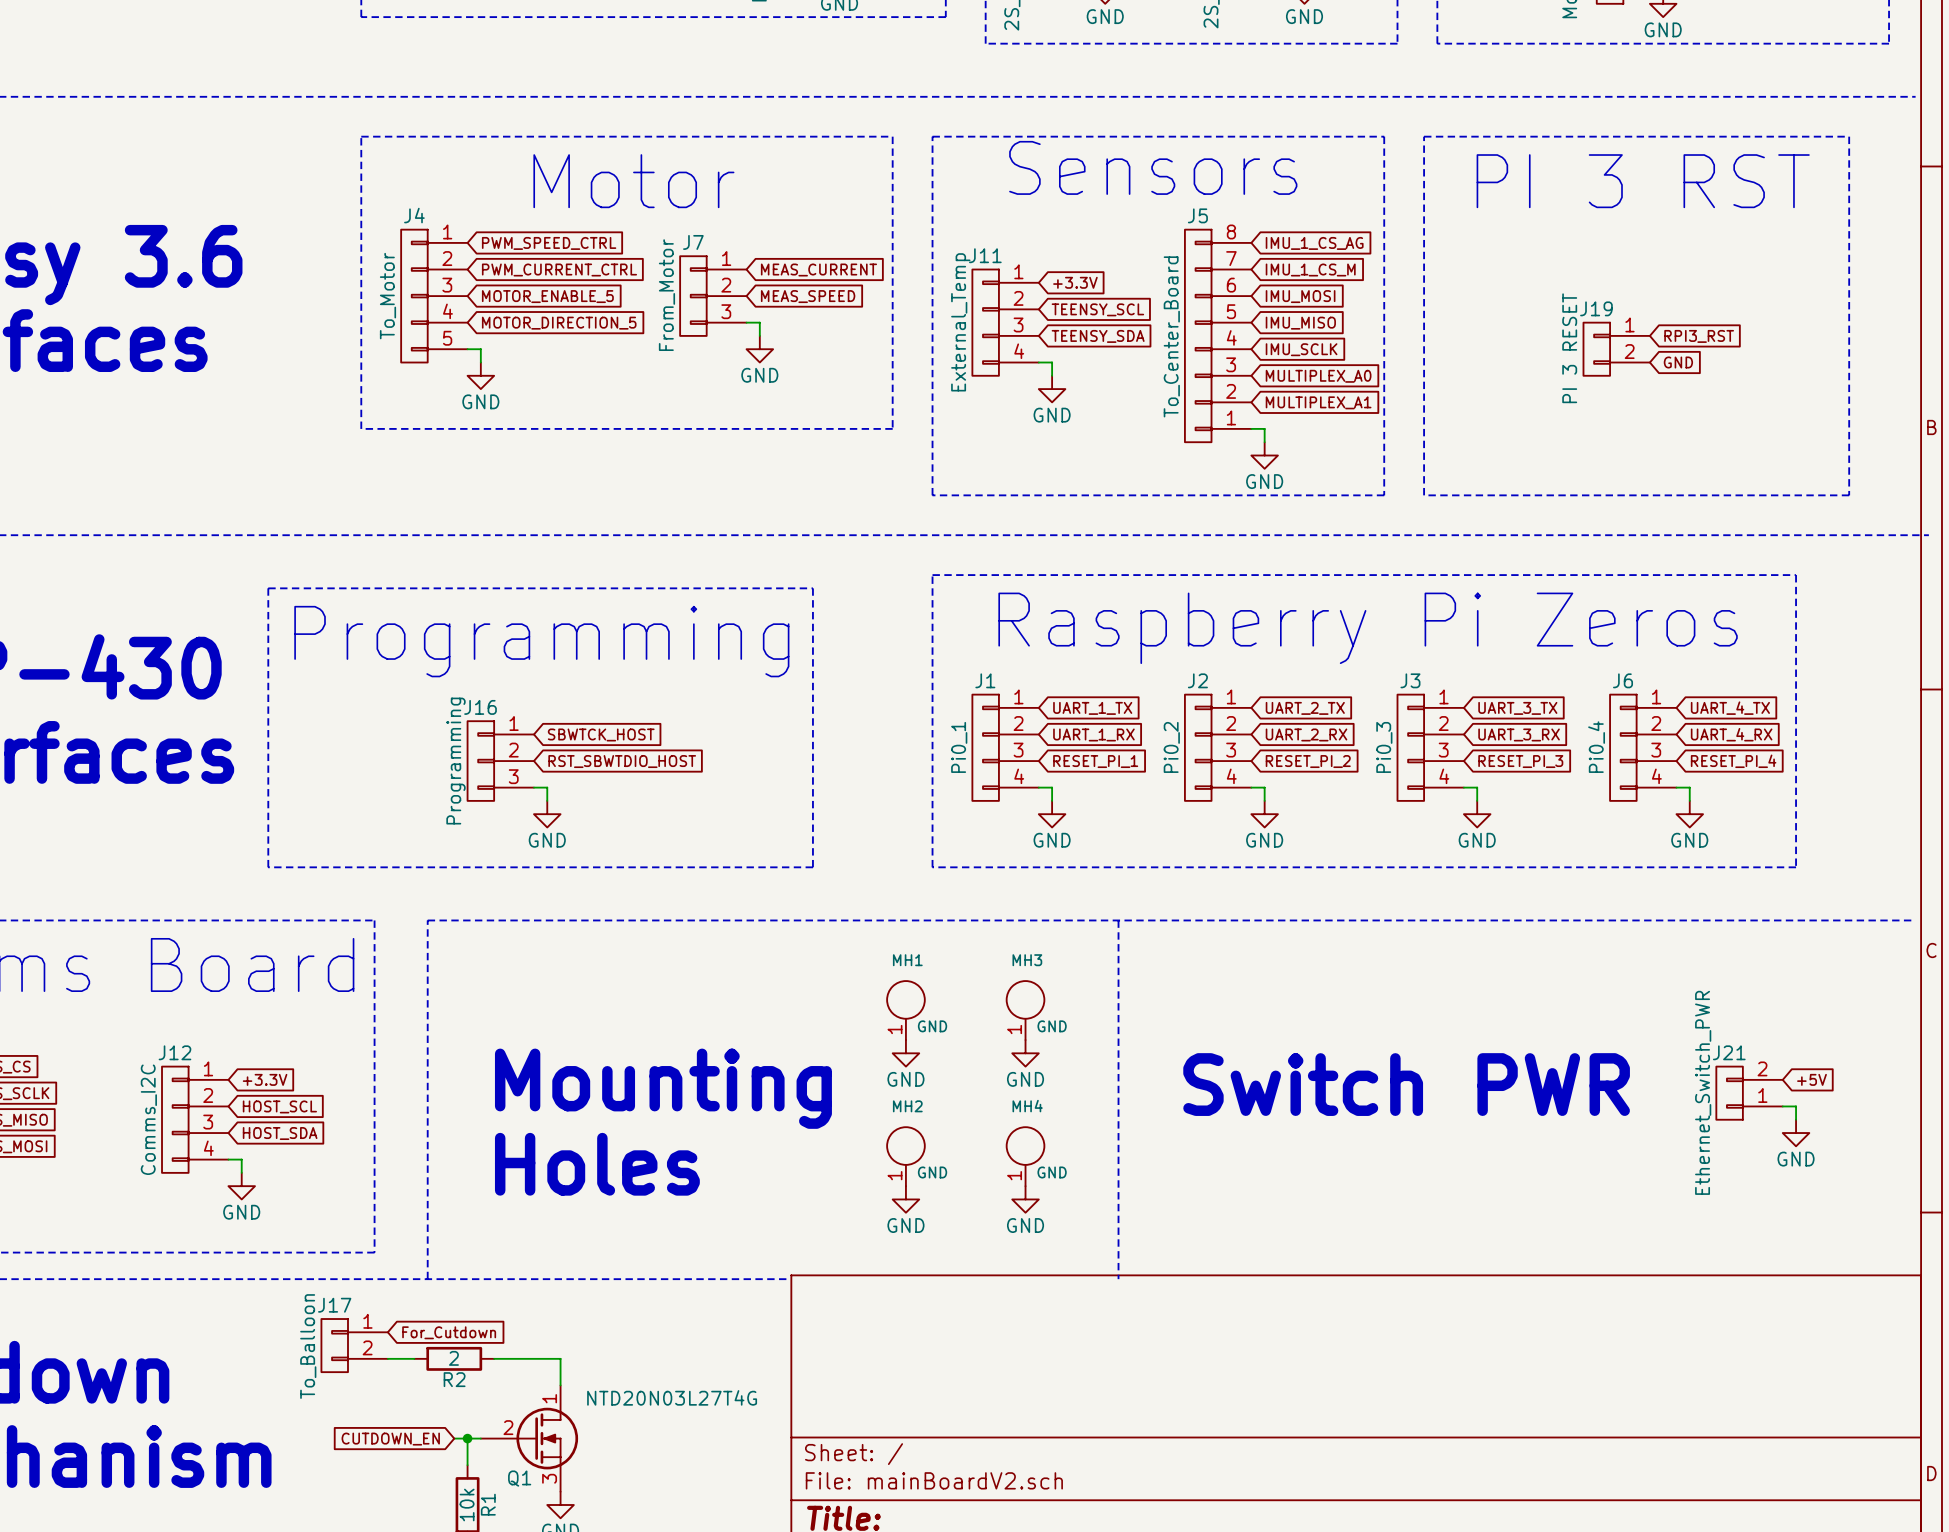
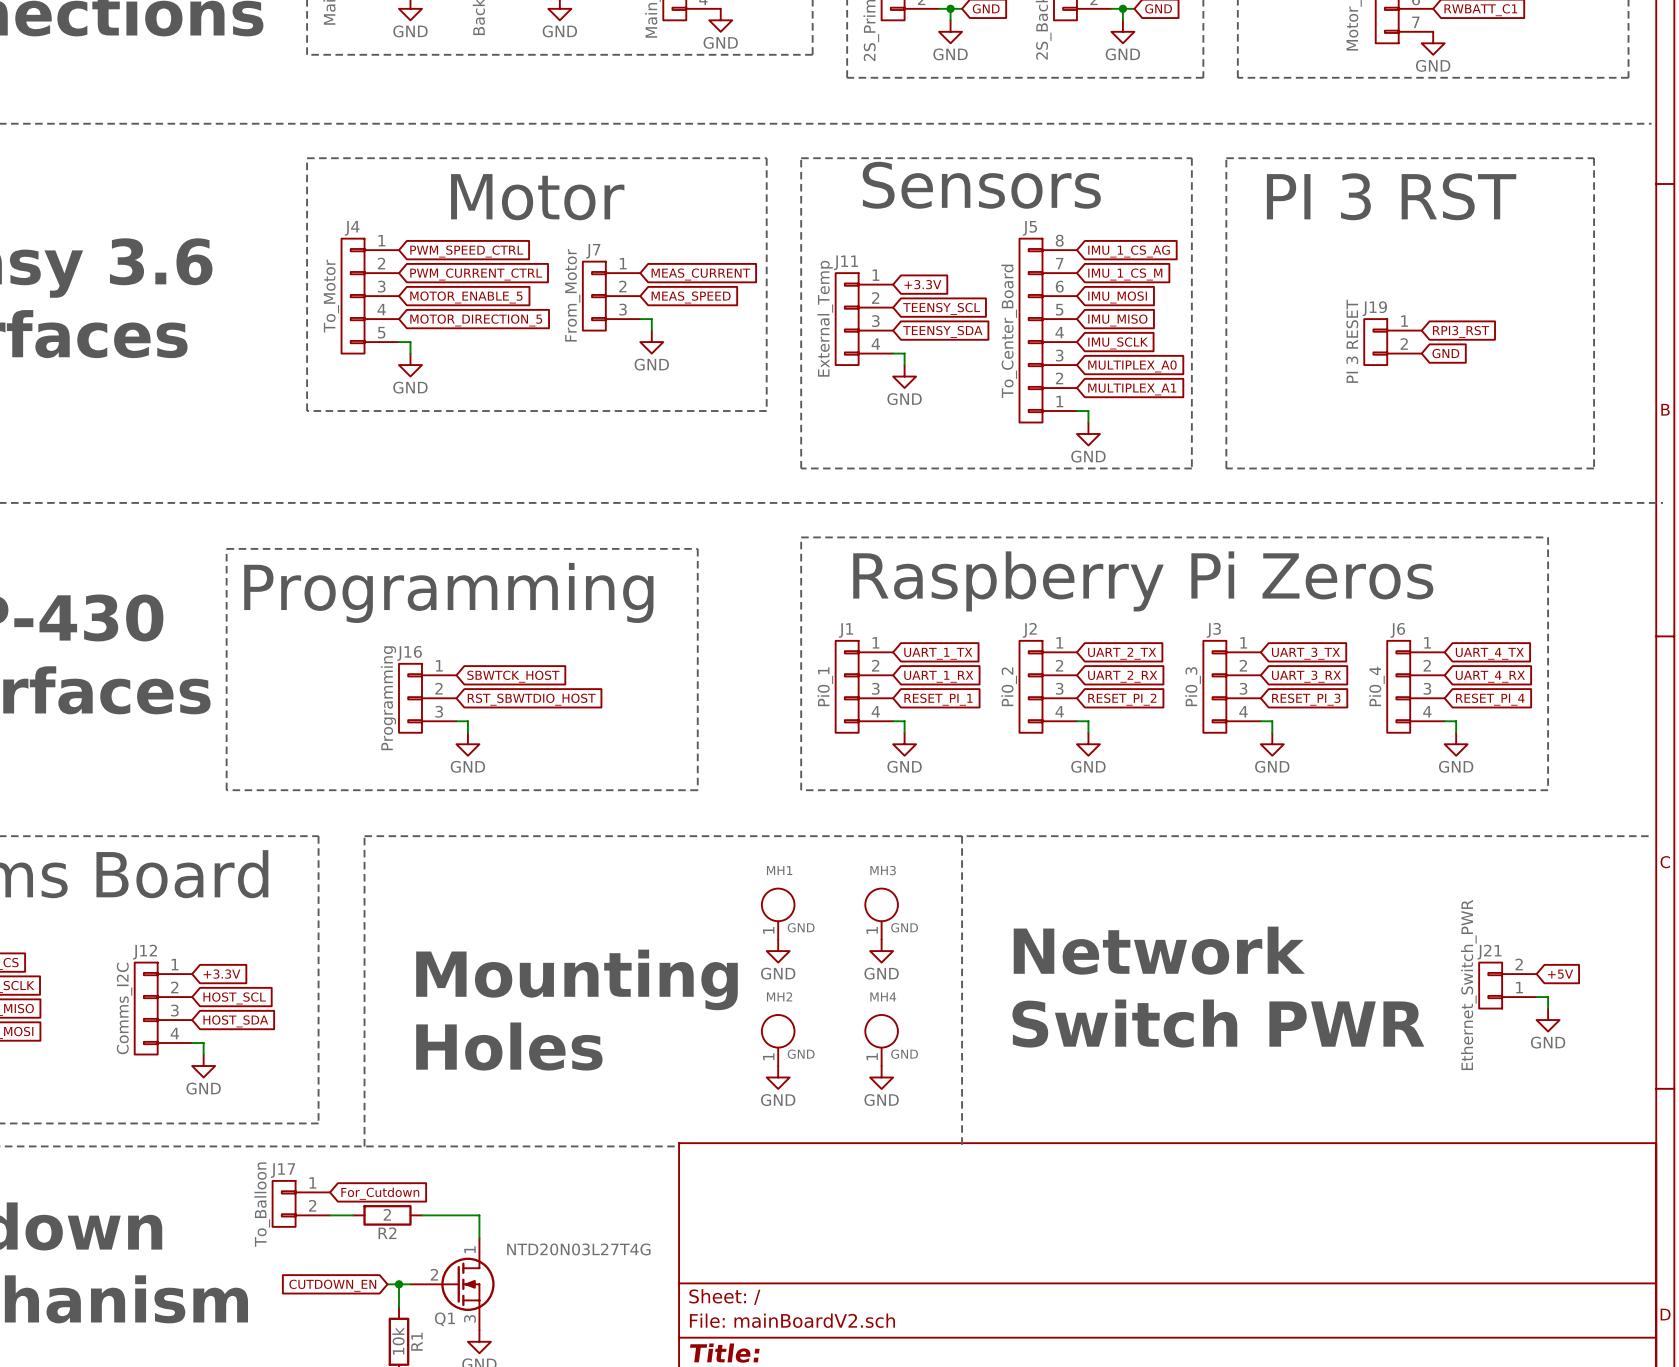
text: none -> Network (1159, 950)
text position: Switch PWR (1406, 1084) -> Switch PWR (1218, 1023)

